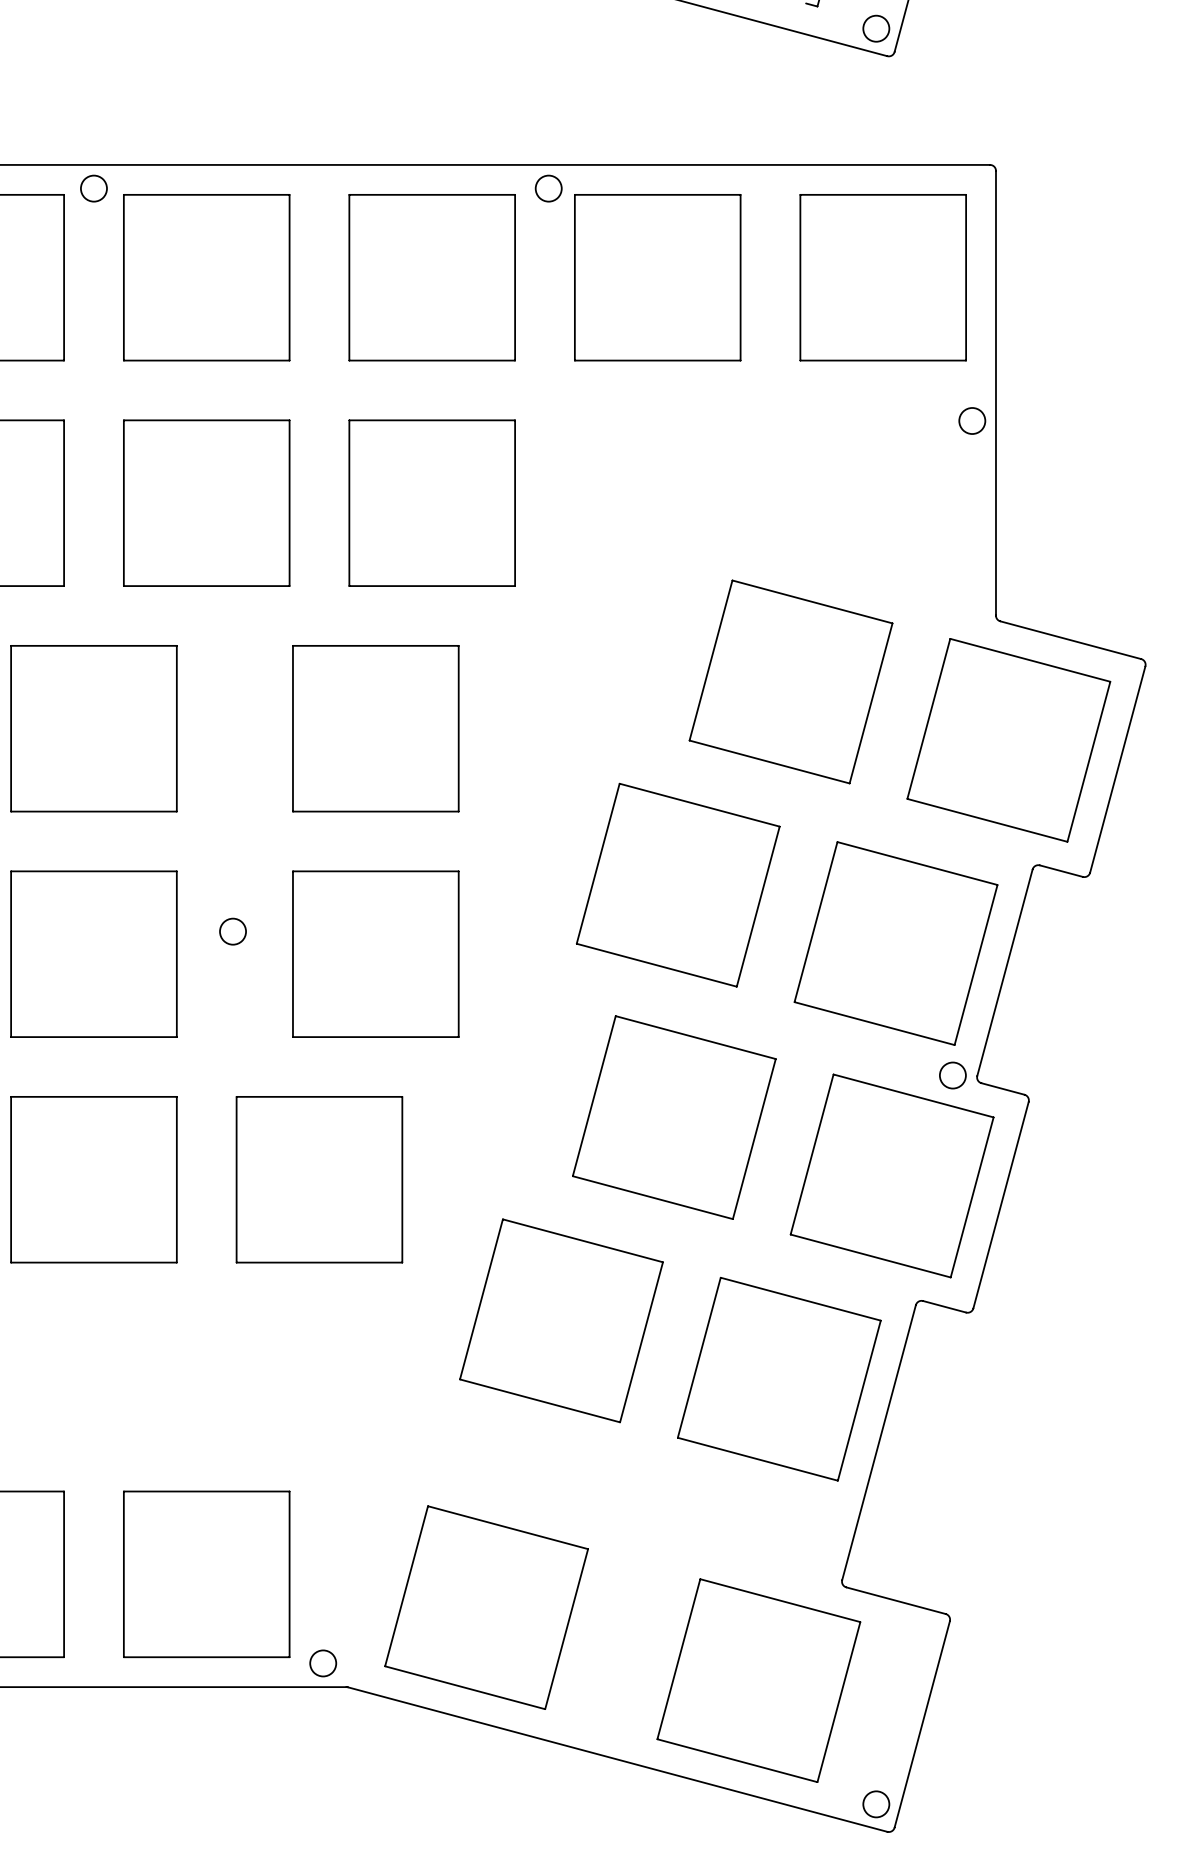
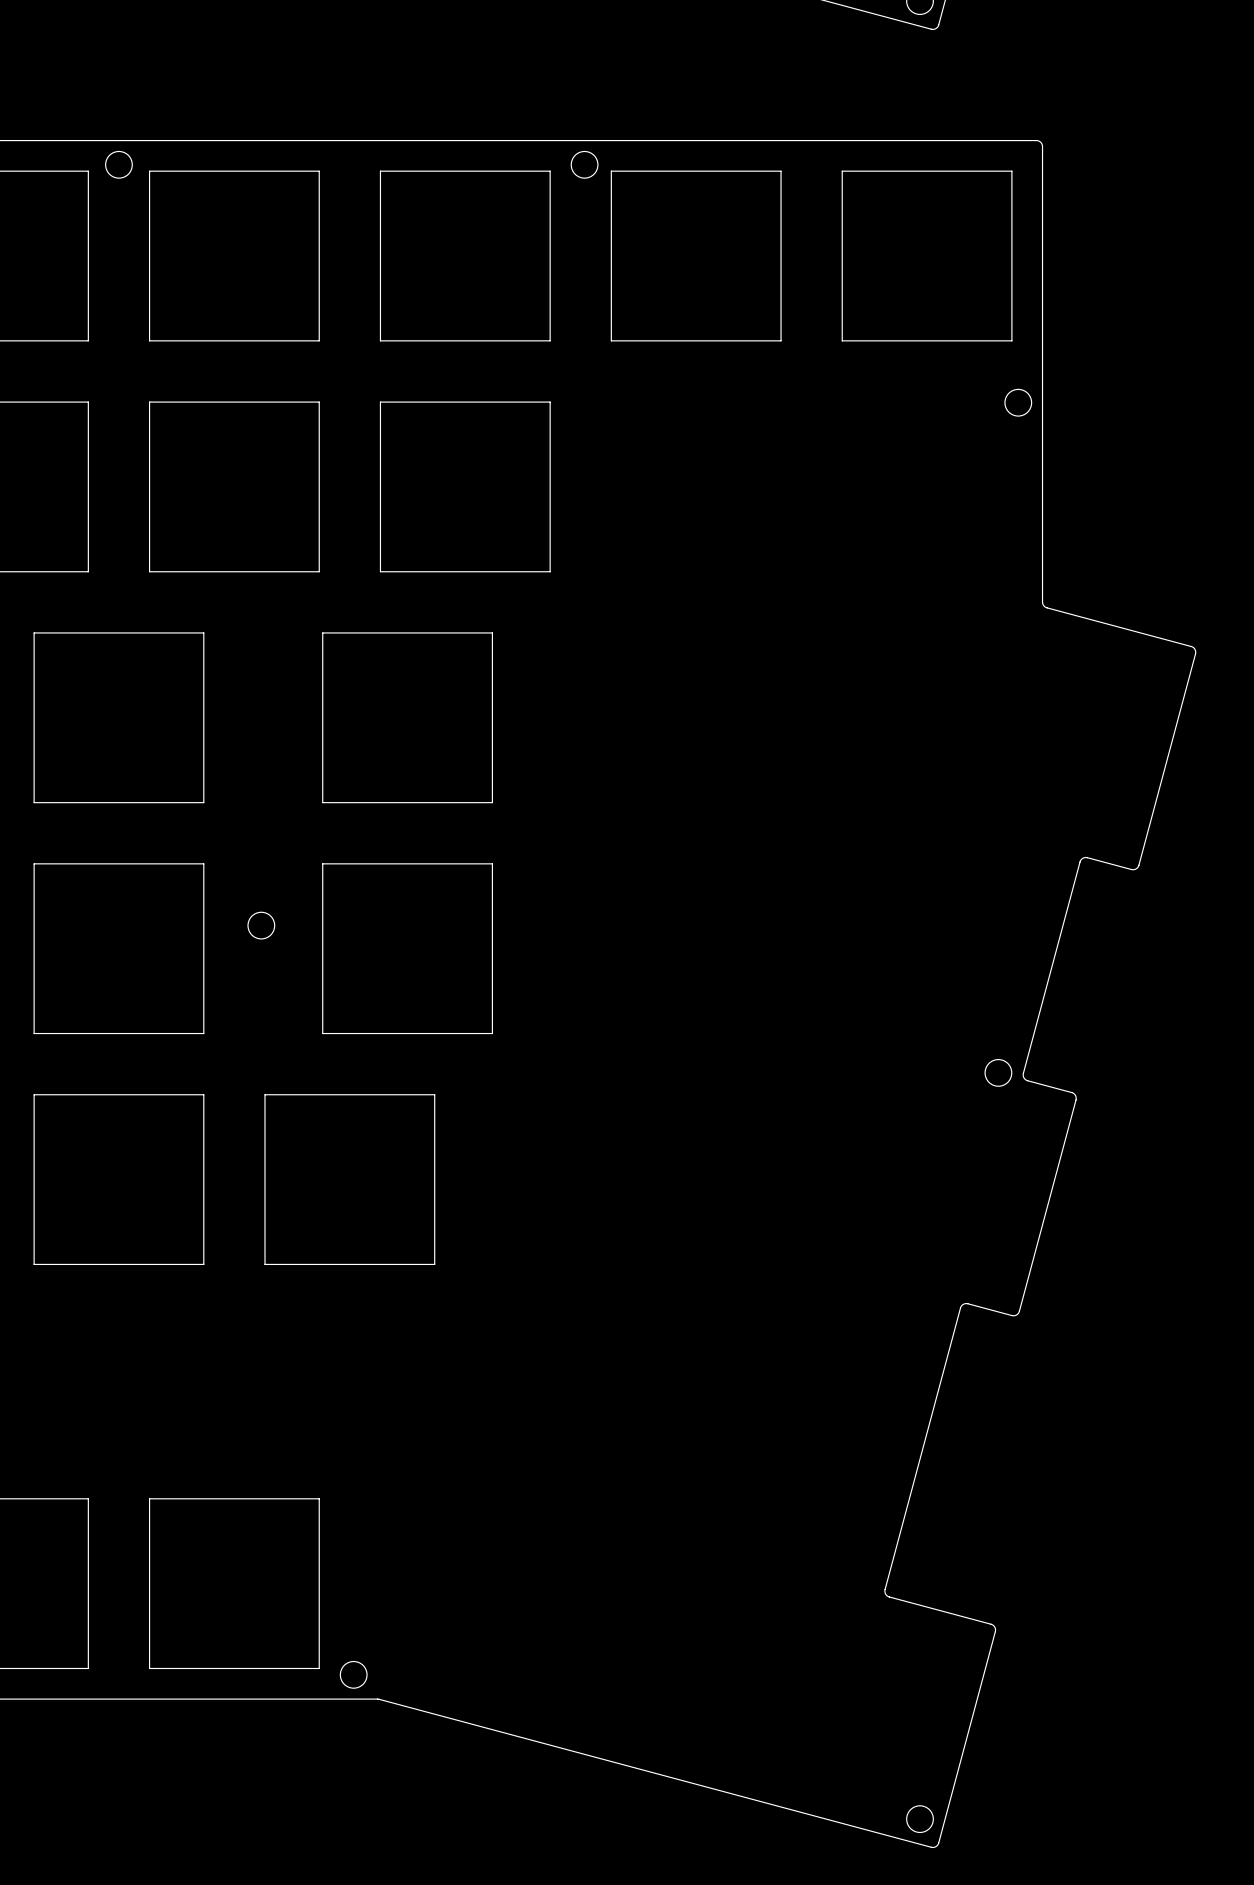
board edge: (732, 580) (892, 623) (849, 783) (689, 740) (732, 580) -> none
board edge: (950, 638) (1110, 681) (1067, 841) (907, 798) (950, 638) -> none
board edge: (619, 783) (576, 943) (736, 986) (779, 826) (619, 783) -> none
board edge: (837, 842) (794, 1002) (954, 1045) (997, 884) (837, 842) -> none
board edge: (615, 1016) (572, 1176) (732, 1219) (775, 1059) (615, 1016) -> none
board edge: (833, 1074) (790, 1234) (950, 1277) (993, 1117) (833, 1074) -> none
board edge: (502, 1219) (662, 1262) (620, 1422) (460, 1379) (502, 1219) -> none
board edge: (720, 1277) (677, 1437) (837, 1480) (880, 1320) (720, 1277) -> none
board edge: (428, 1506) (588, 1549) (545, 1709) (385, 1666) (428, 1506) -> none
board edge: (700, 1579) (657, 1739) (817, 1782) (860, 1622) (700, 1579) -> none

